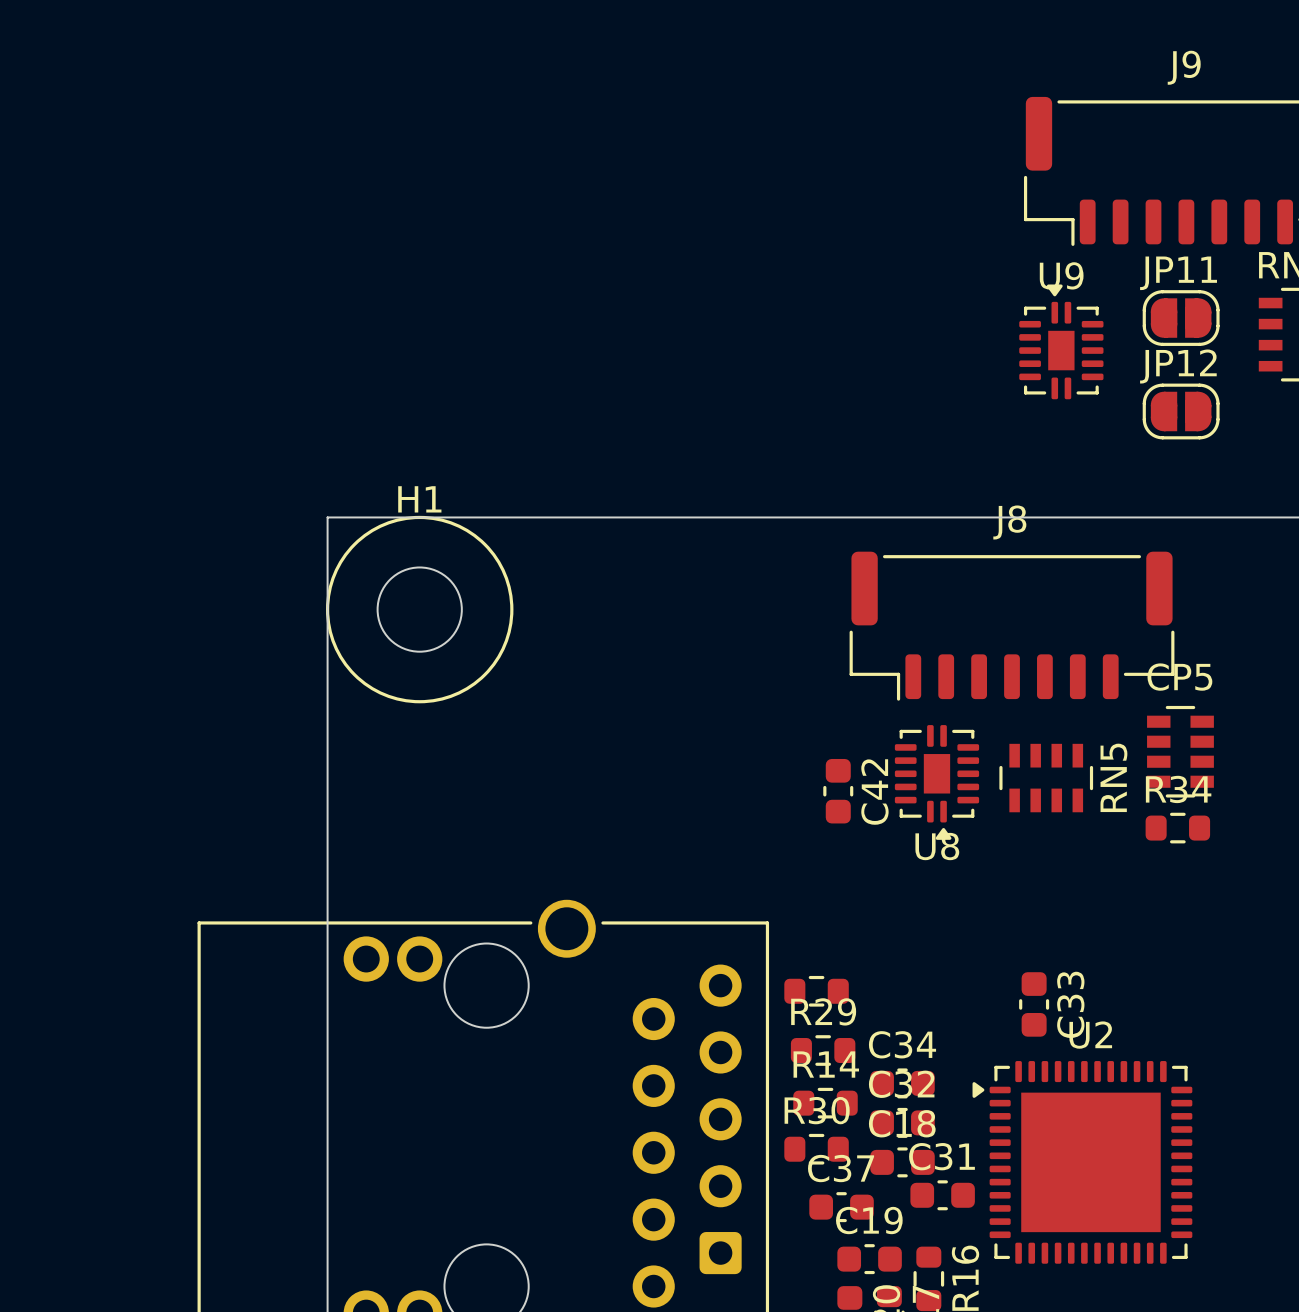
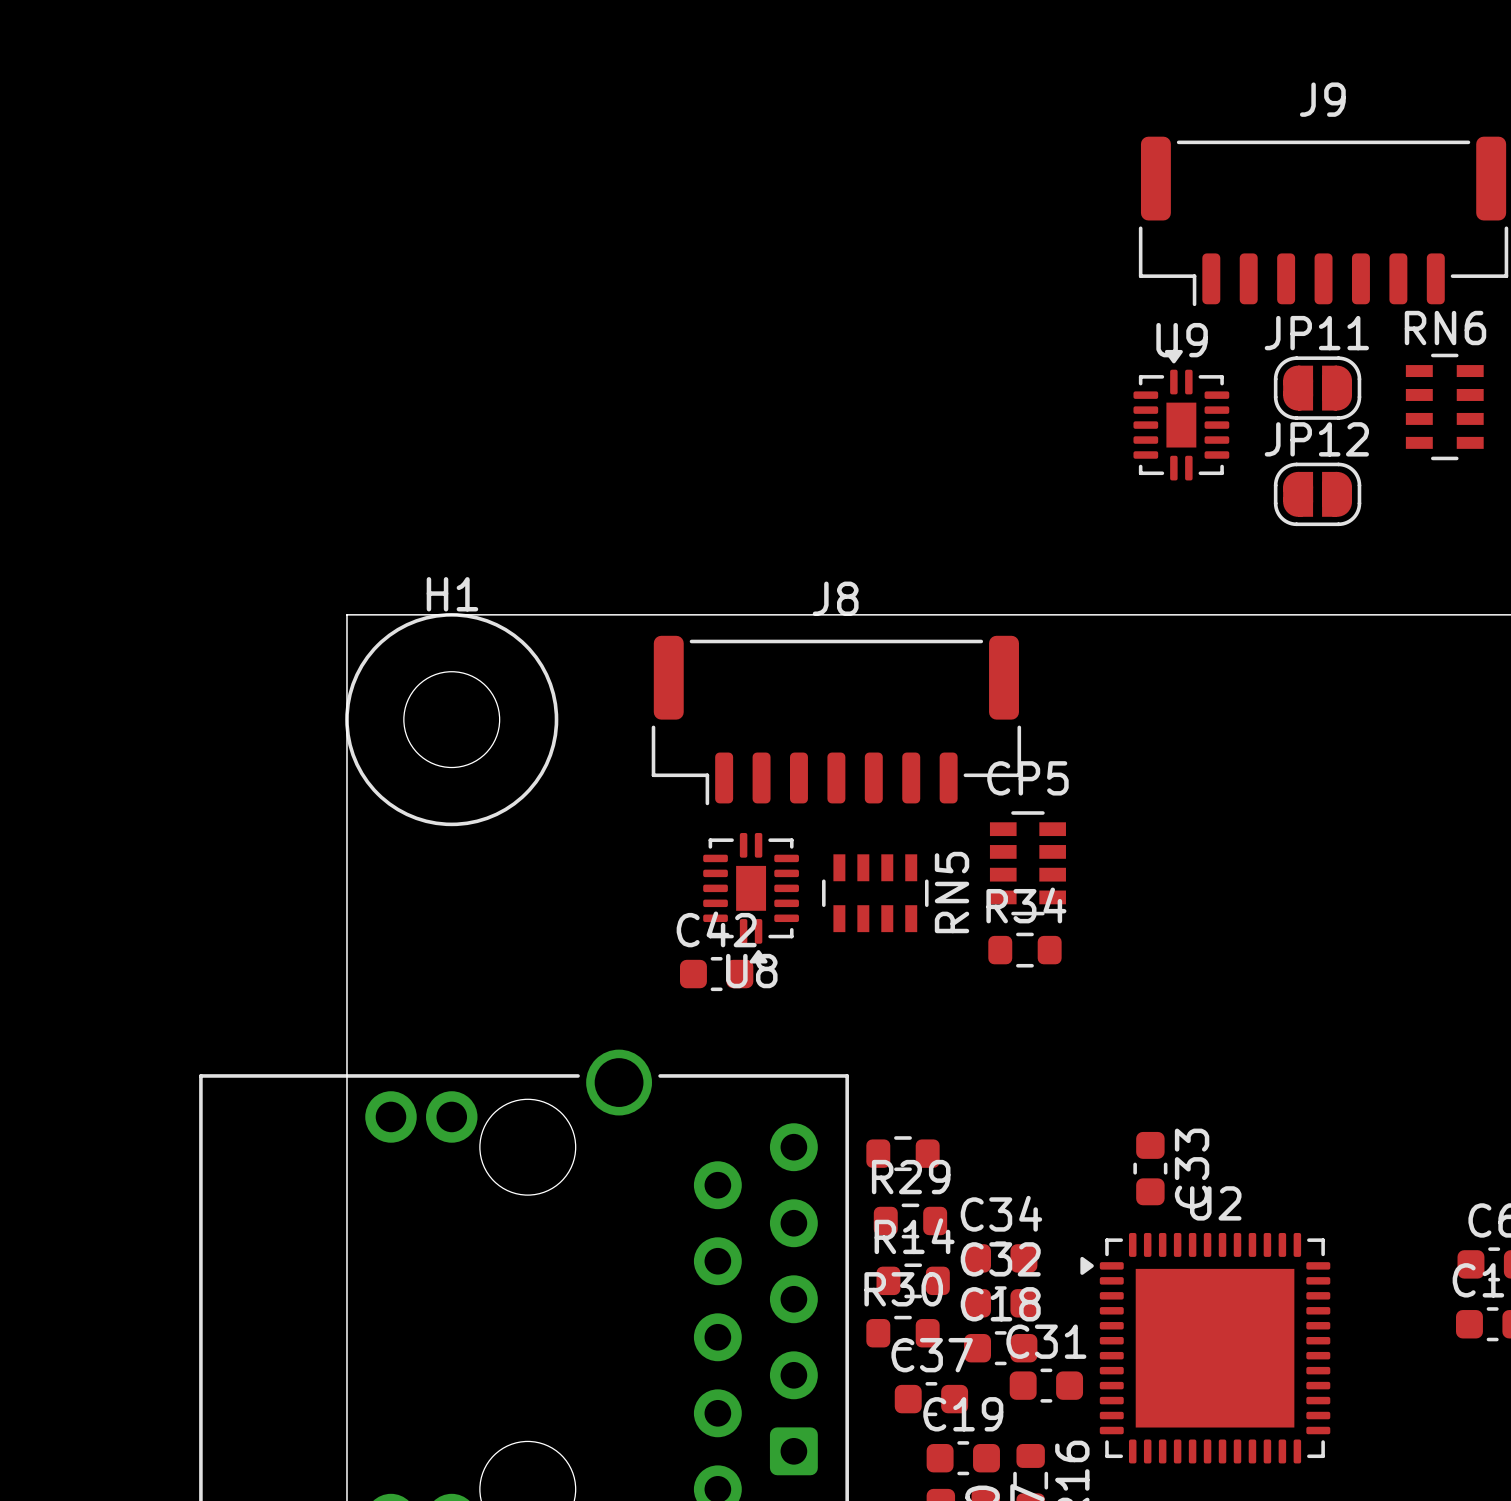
J8 position: (1012, 626) -> (836, 720)
CP5 position: (1180, 751) -> (1027, 863)
RN5 position: (1046, 778) -> (875, 893)
U8 position: (936, 782) -> (751, 898)
C42 rotation: 0° (838, 791) -> 90° clockwise (716, 974)
C42 position: (838, 791) -> (716, 974)
C42 name position: C42 (874, 792) -> C42 (716, 929)
R34 position: (1177, 828) -> (1024, 950)

